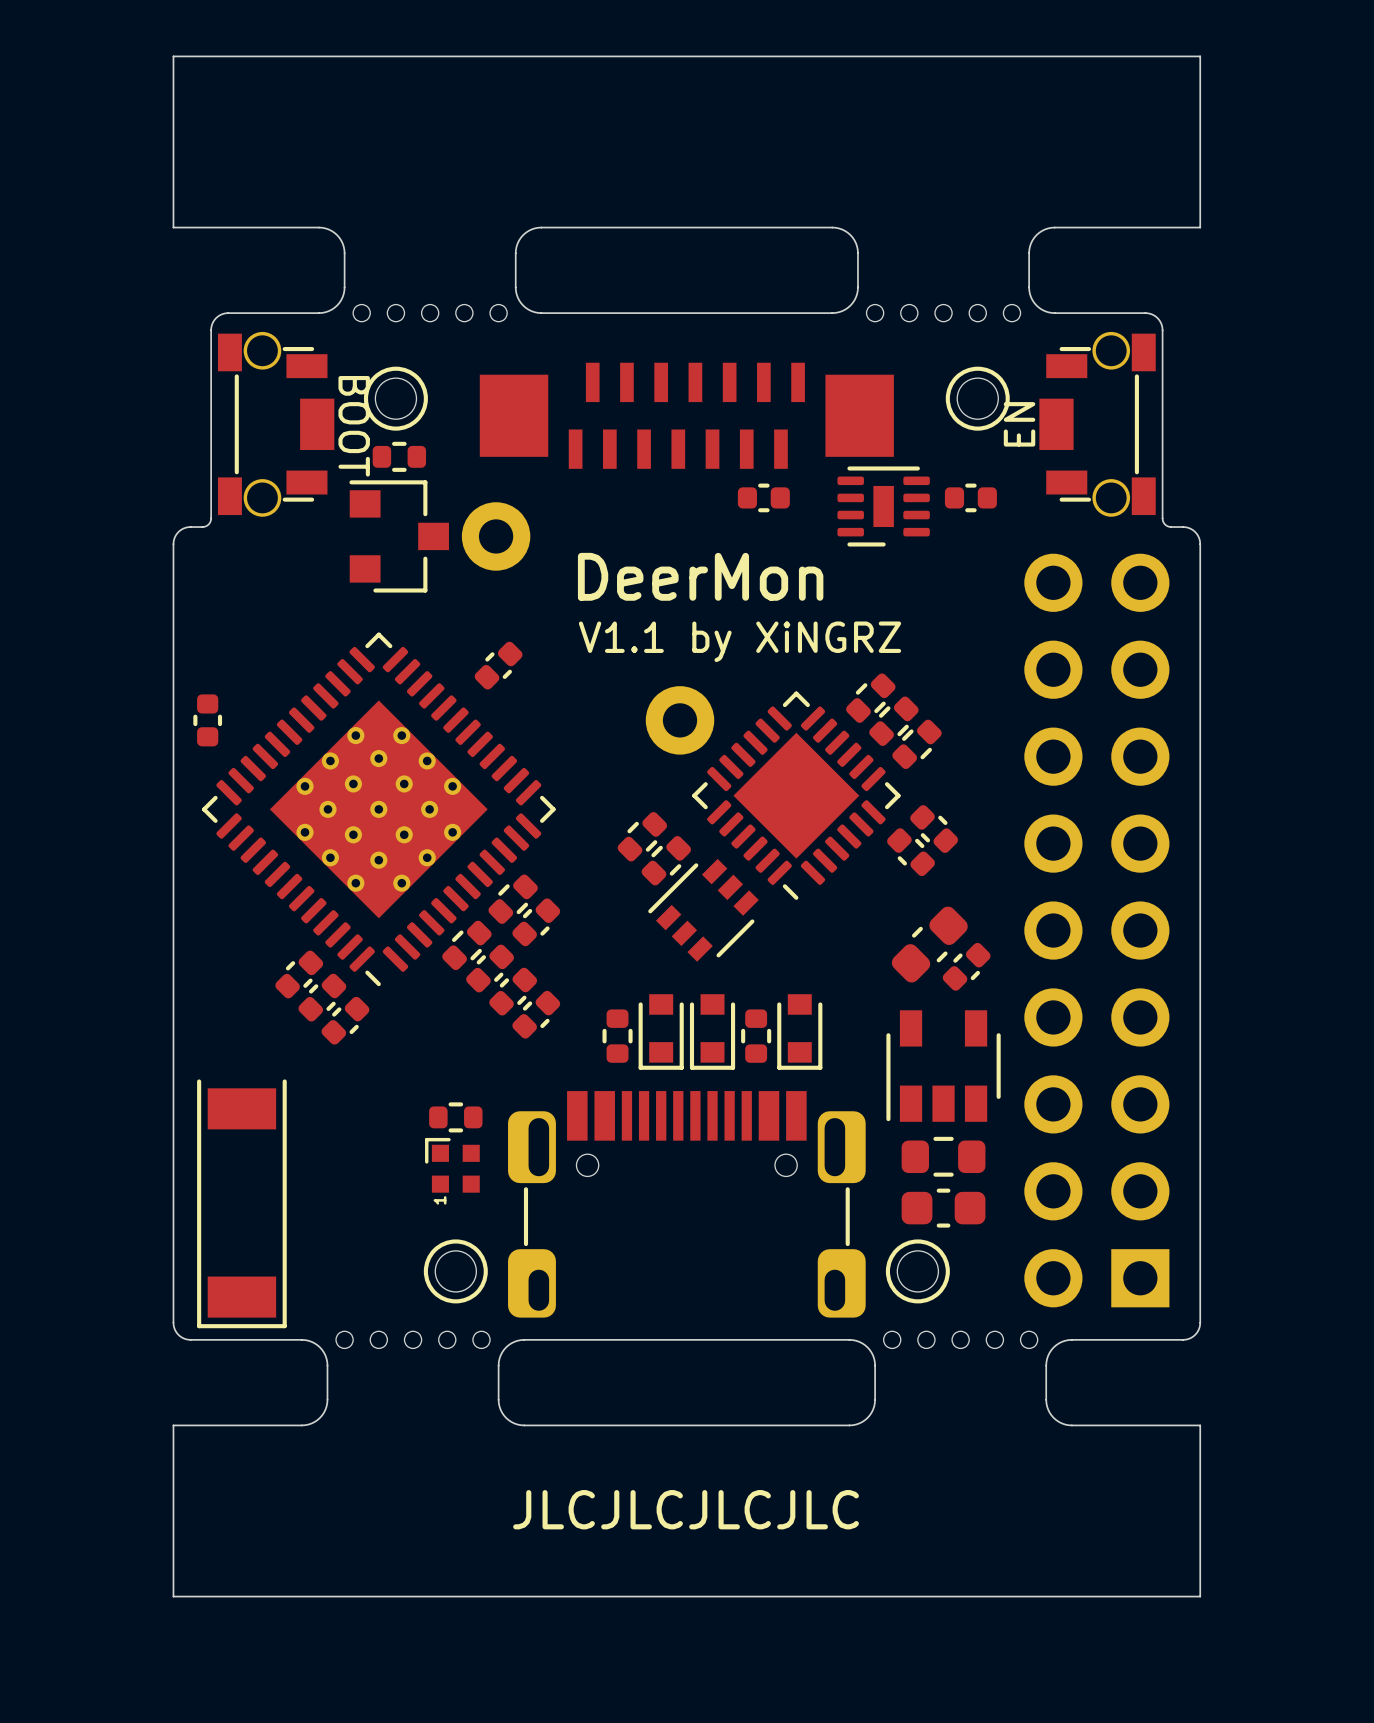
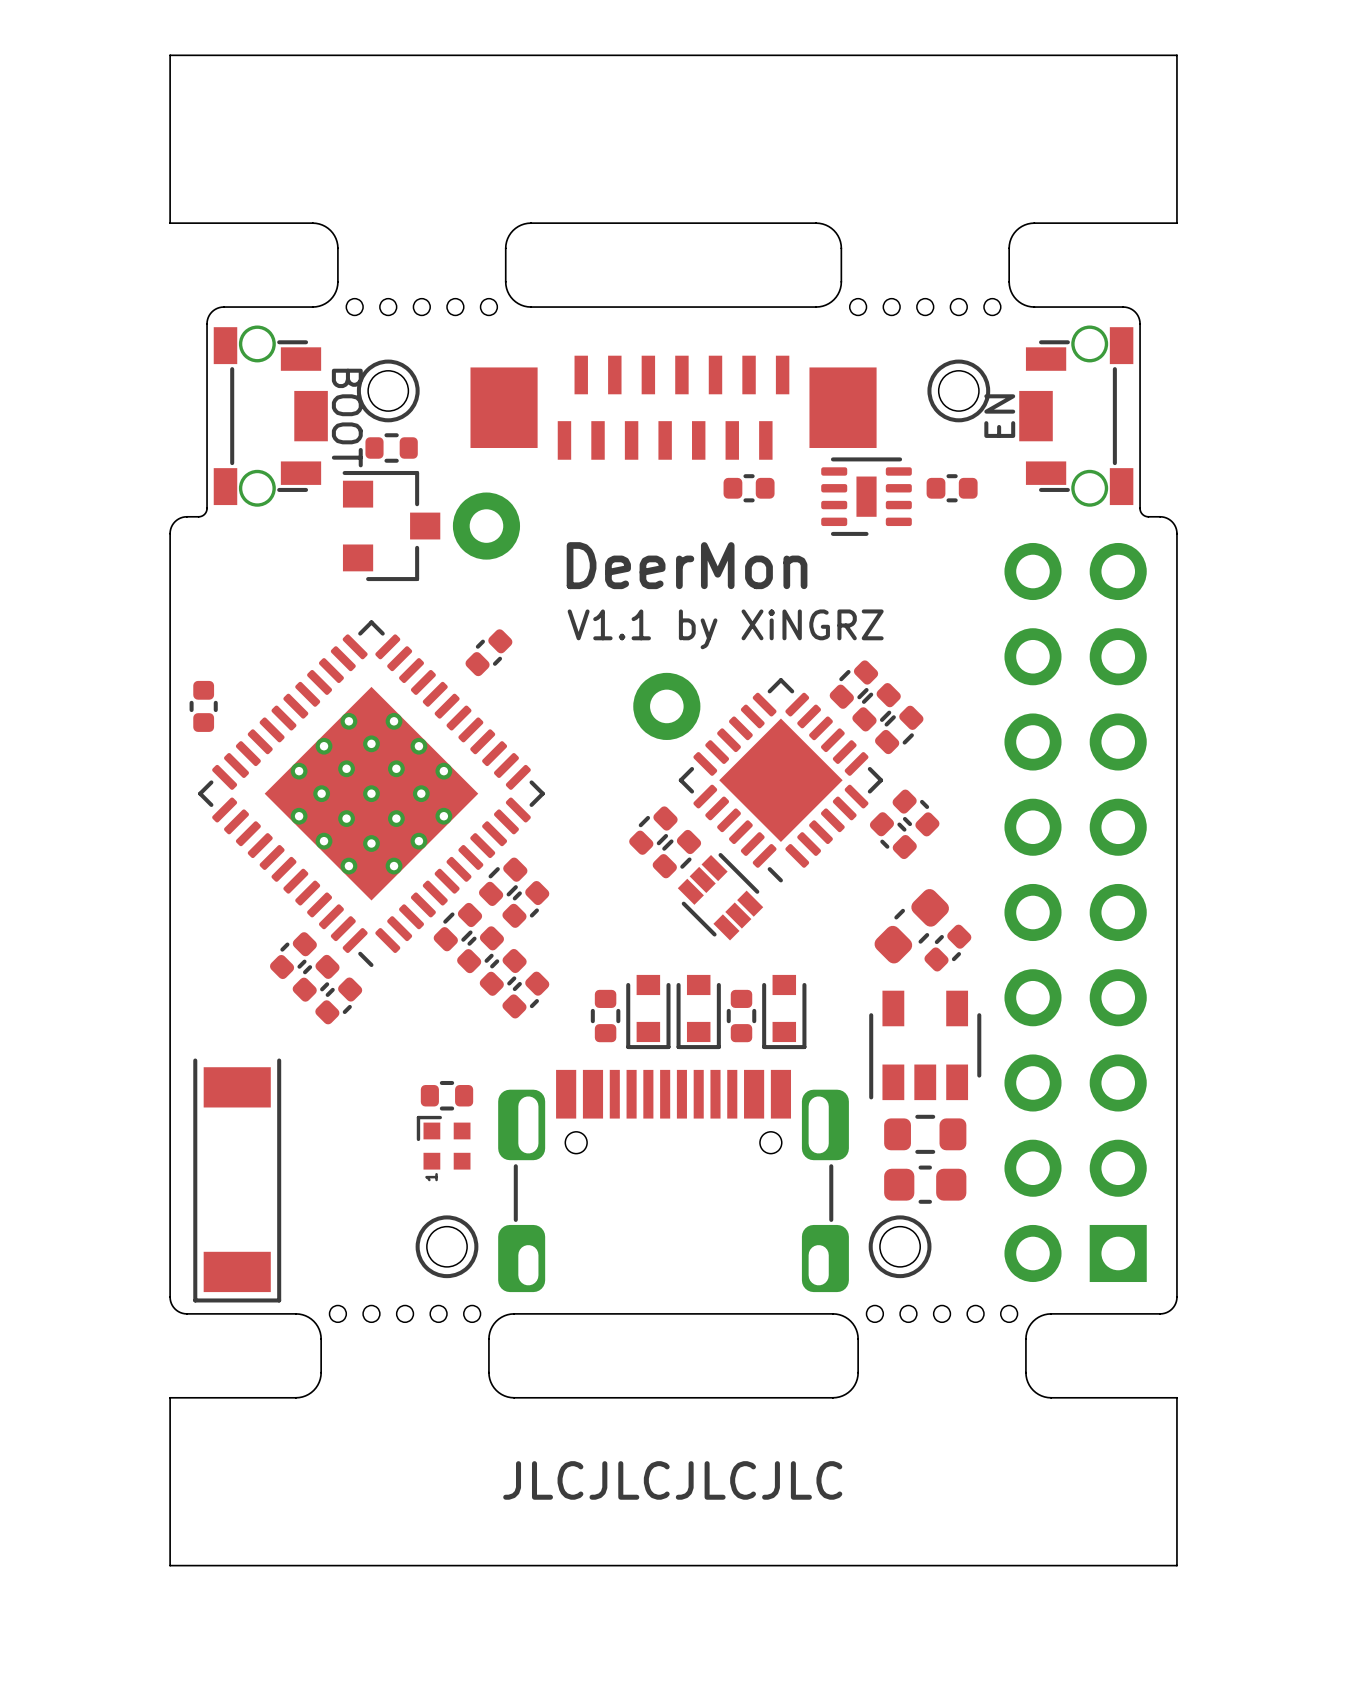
part: (642, 836) -> none
part: none -> (653, 830)
part: (666, 860) -> none
part: none -> (676, 854)
part: (703, 910) -> none
part: none -> (720, 896)

